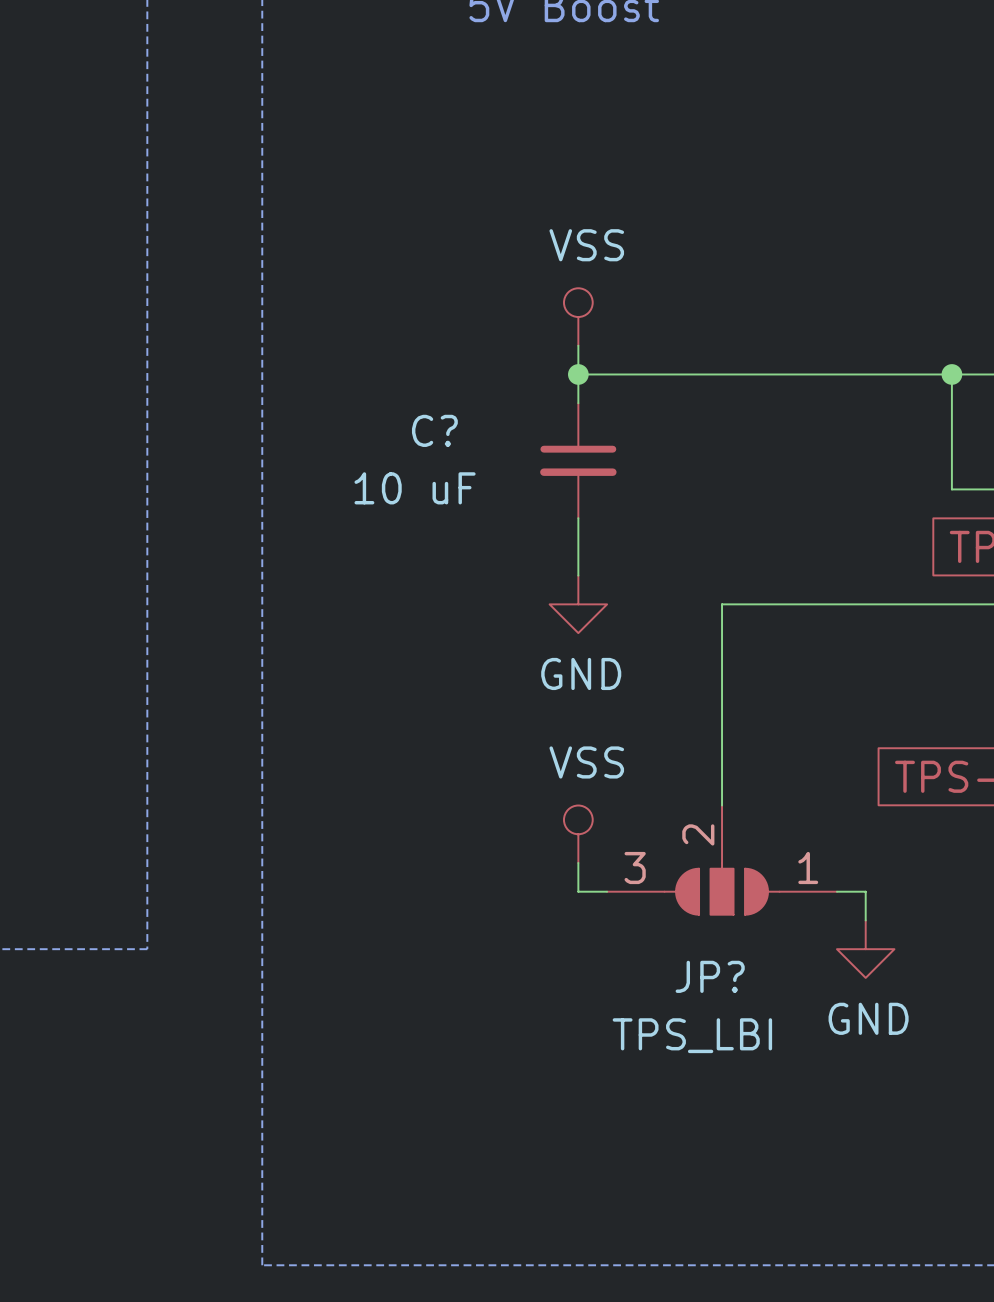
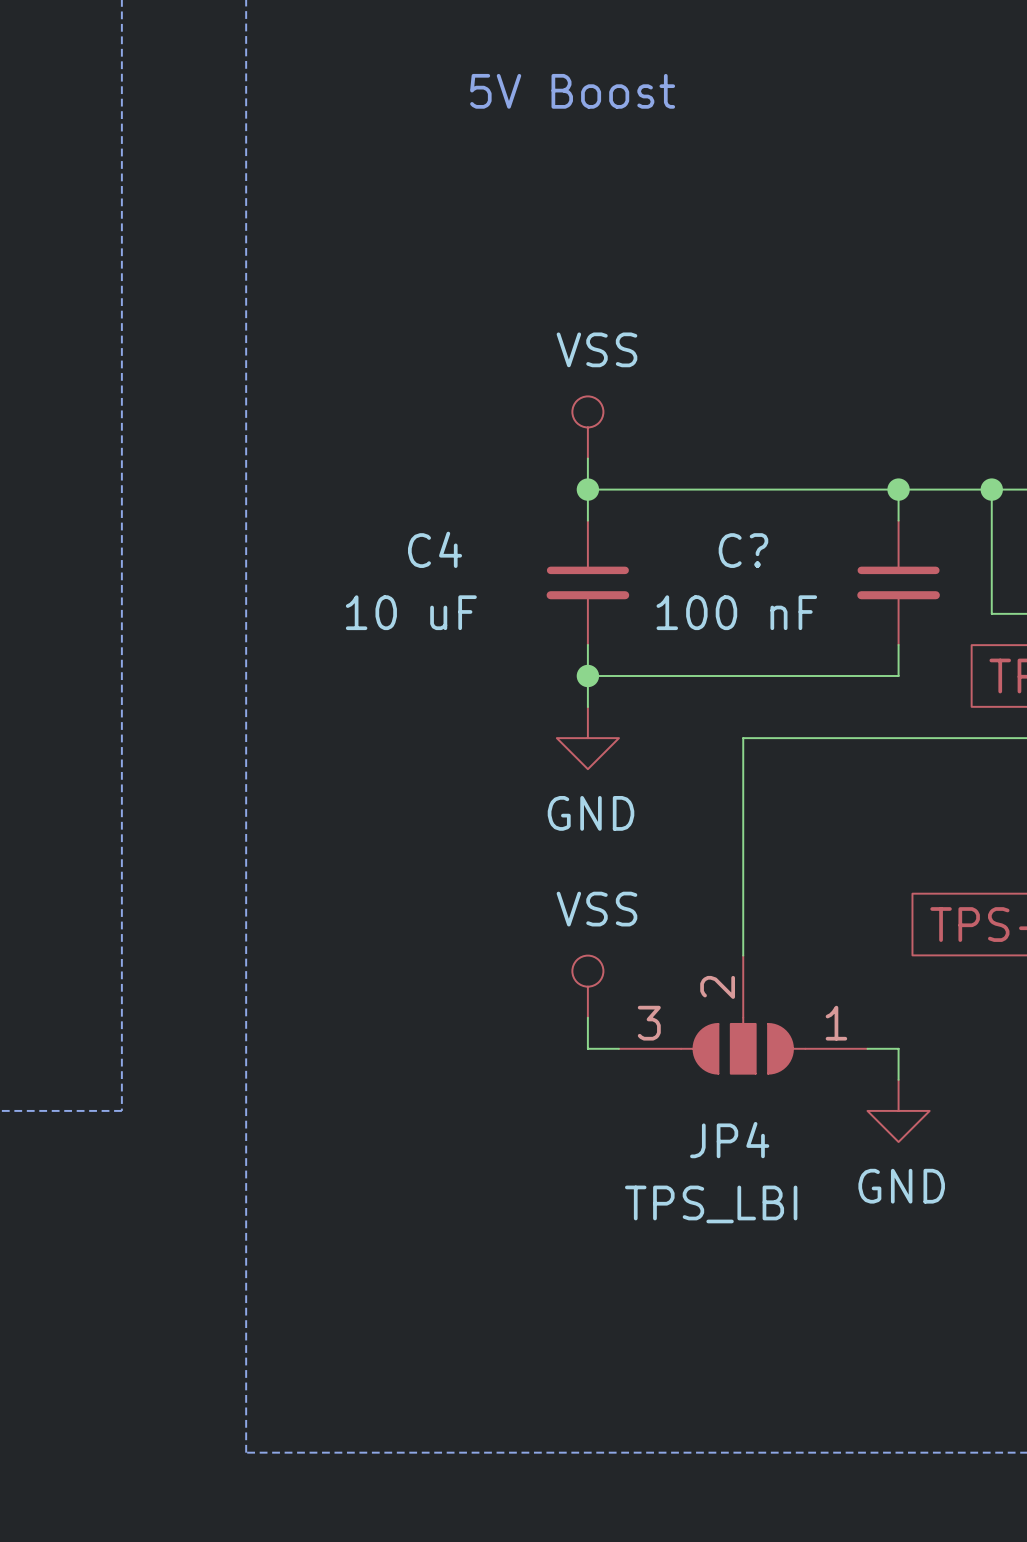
wire: none -> (898, 489) (898, 520)
junction: none -> (898, 489)
C? name: C? (434, 430) -> C4 (435, 549)
C?: none -> 100 nF (898, 582)
wire: none -> (898, 644) (898, 675) (587, 675)
junction: none -> (587, 675)
JP? name: JP? (710, 976) -> JP4 (729, 1140)

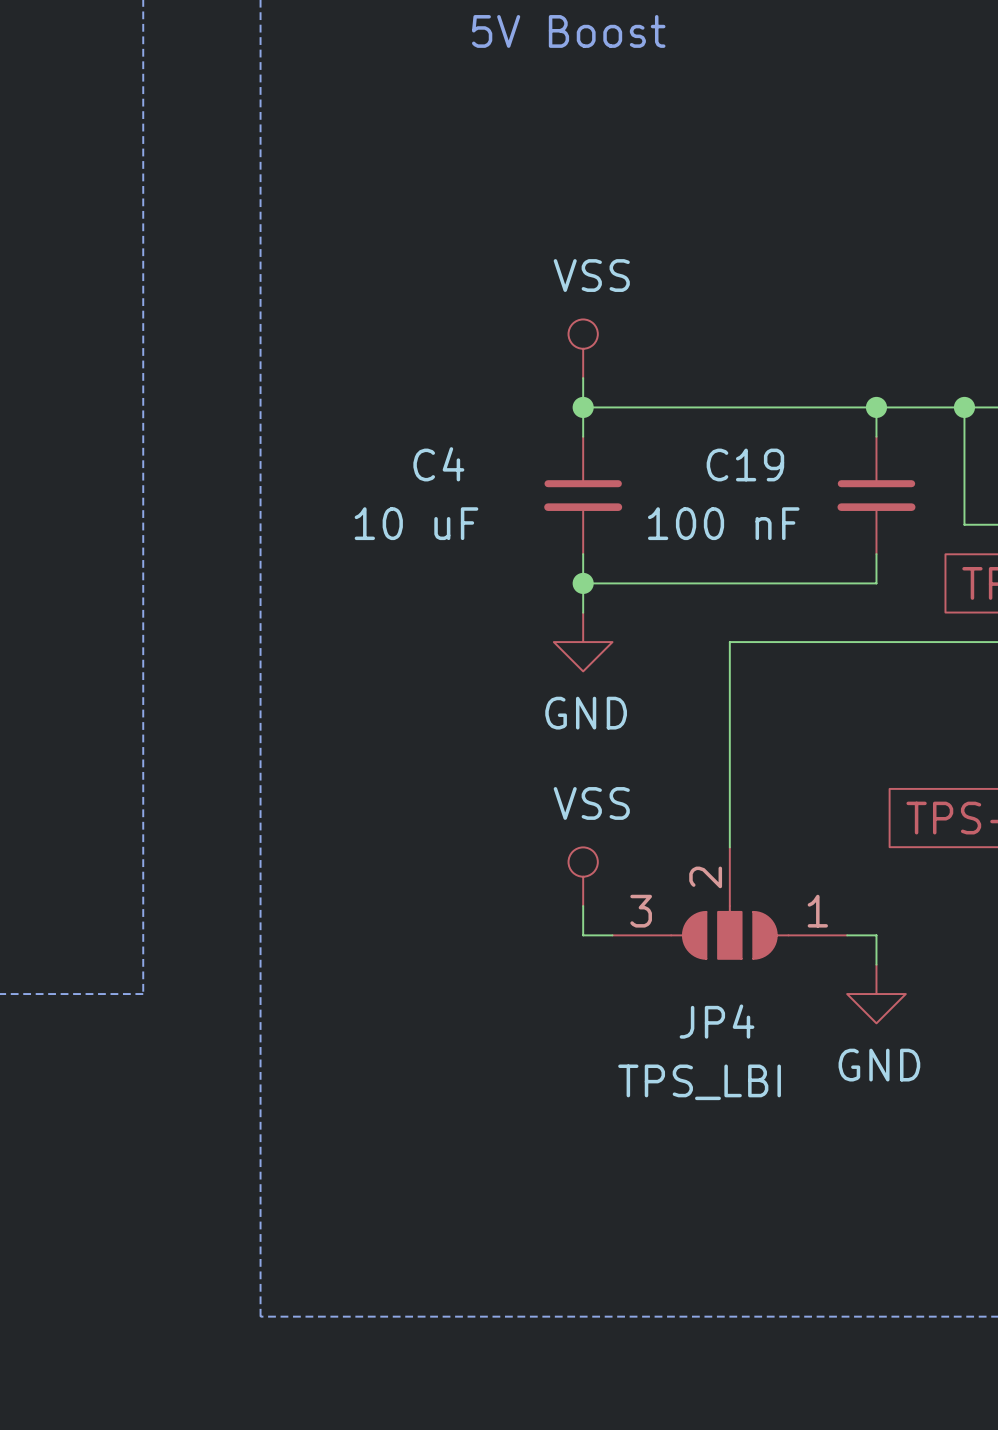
C? name: C? (743, 550) -> C19 (745, 465)

